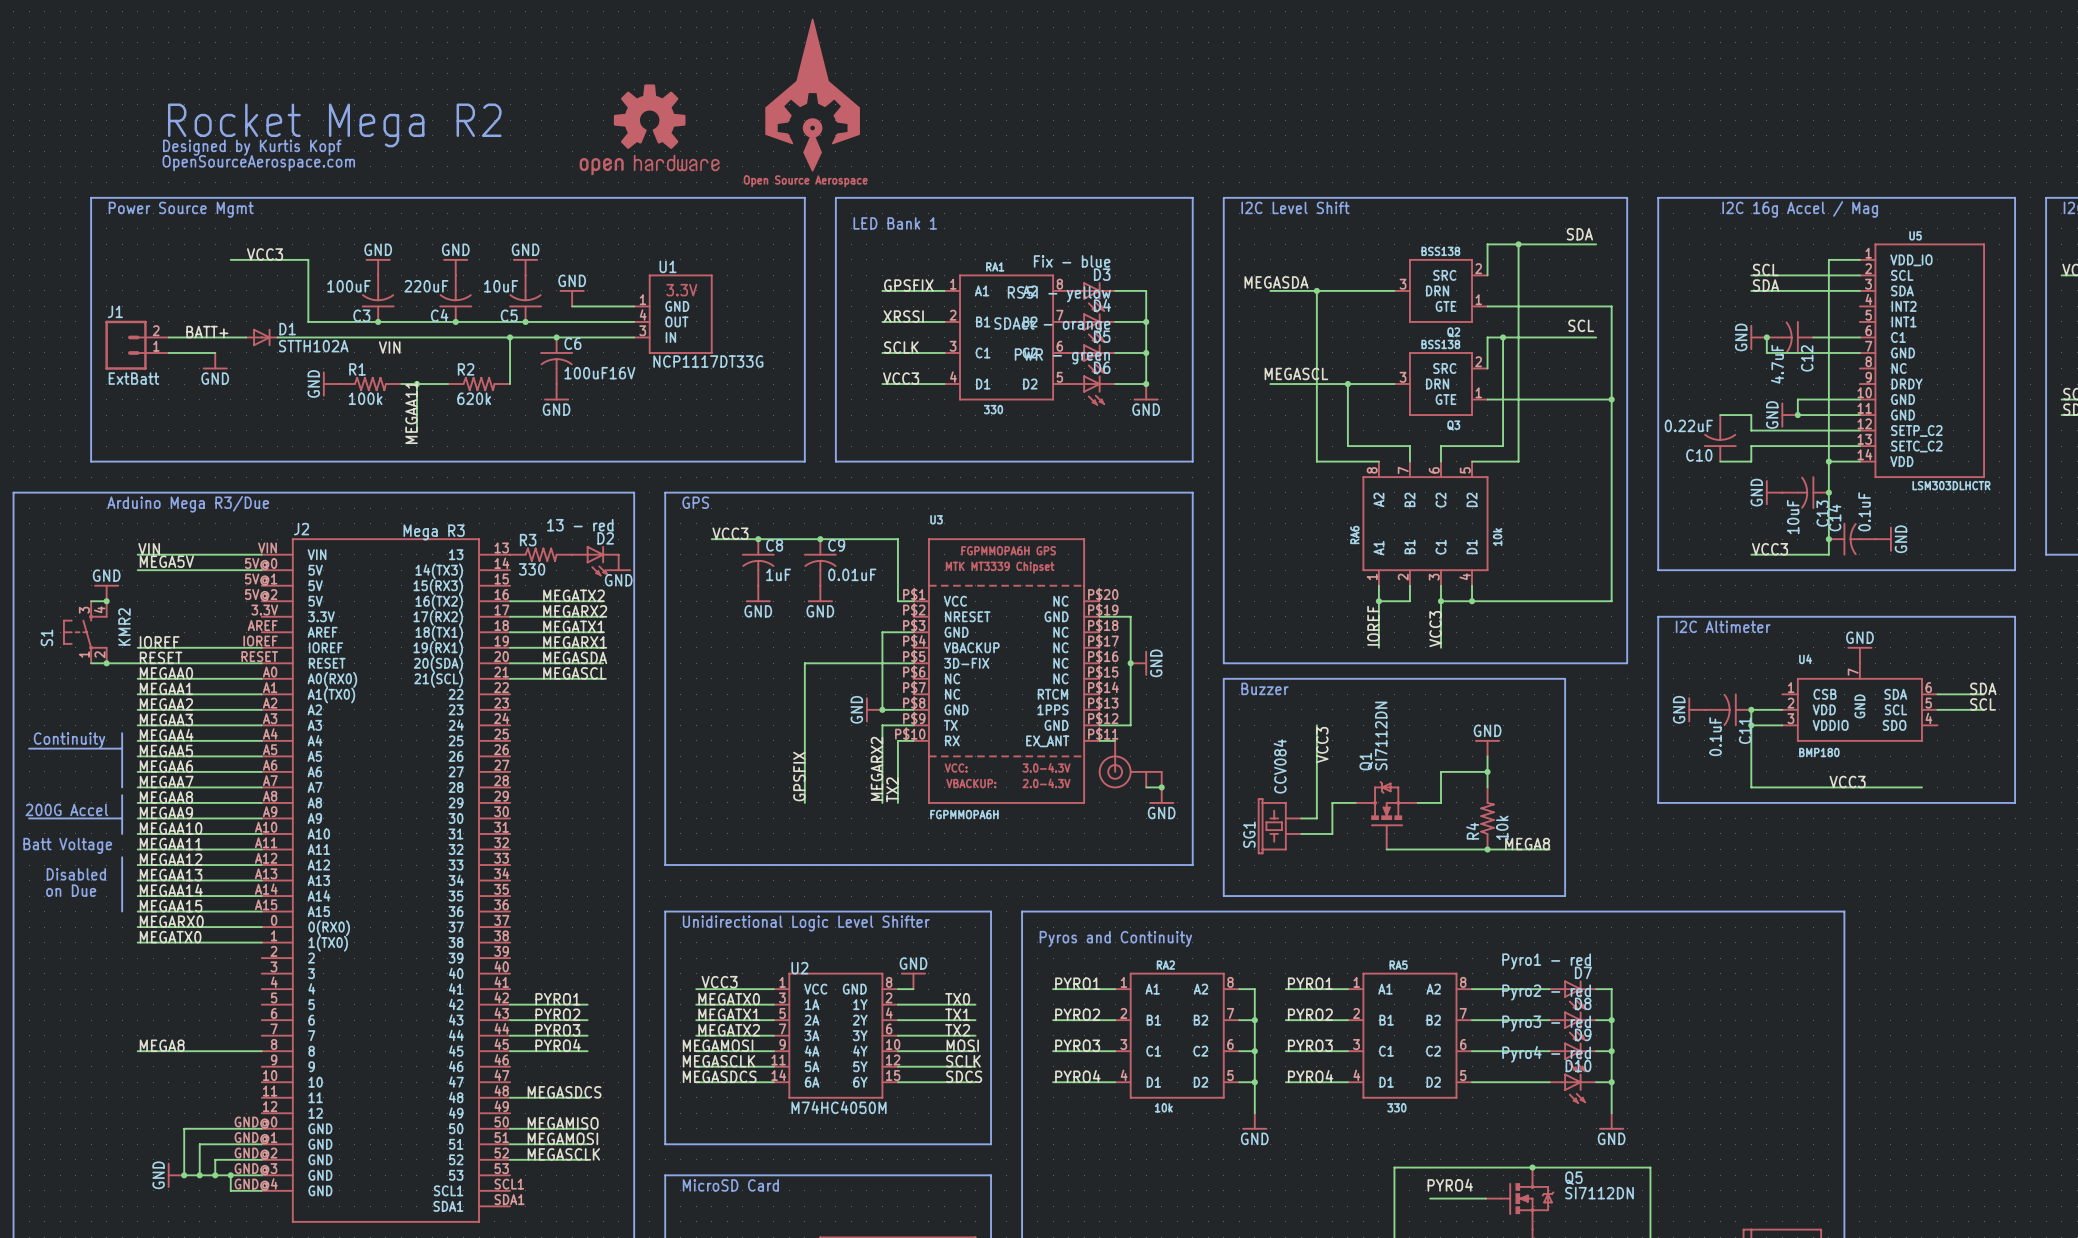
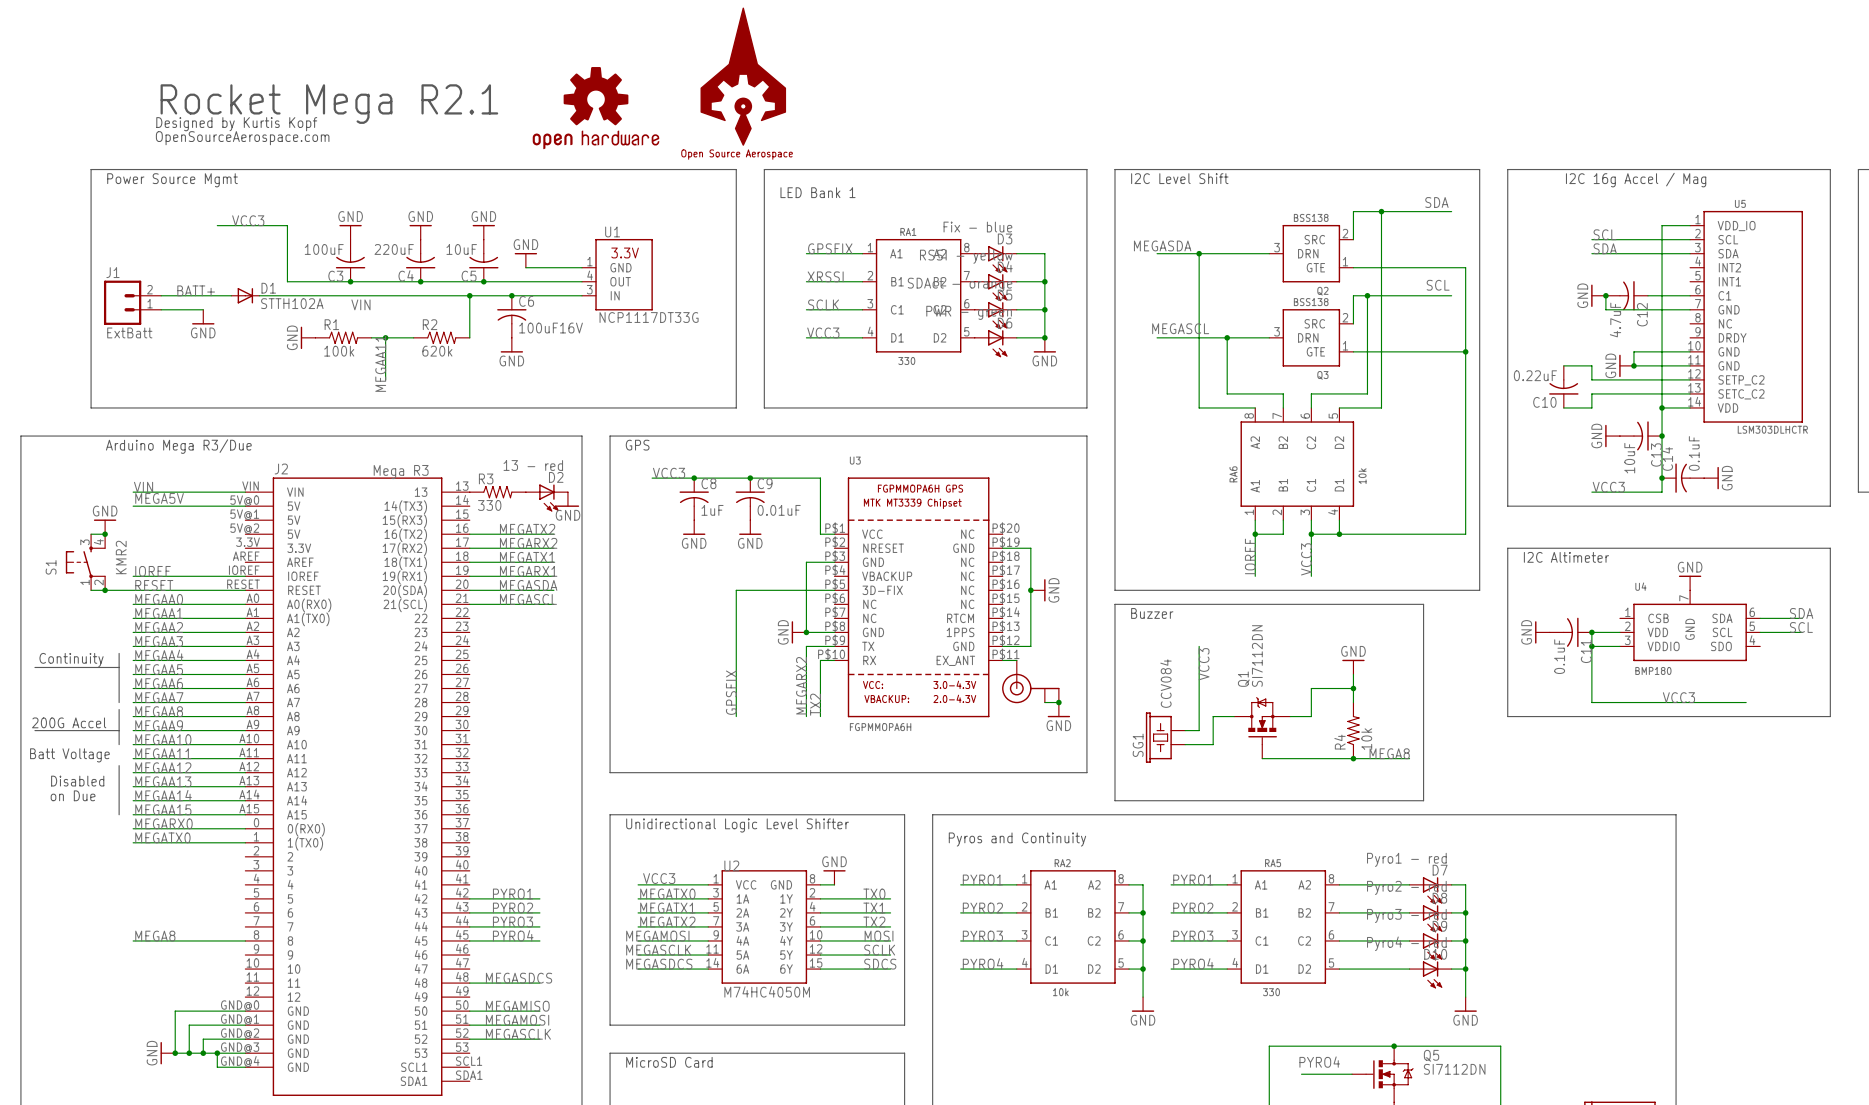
text: Rocket Mega R2 (334, 125) -> Rocket Mega R2.1 (329, 104)

